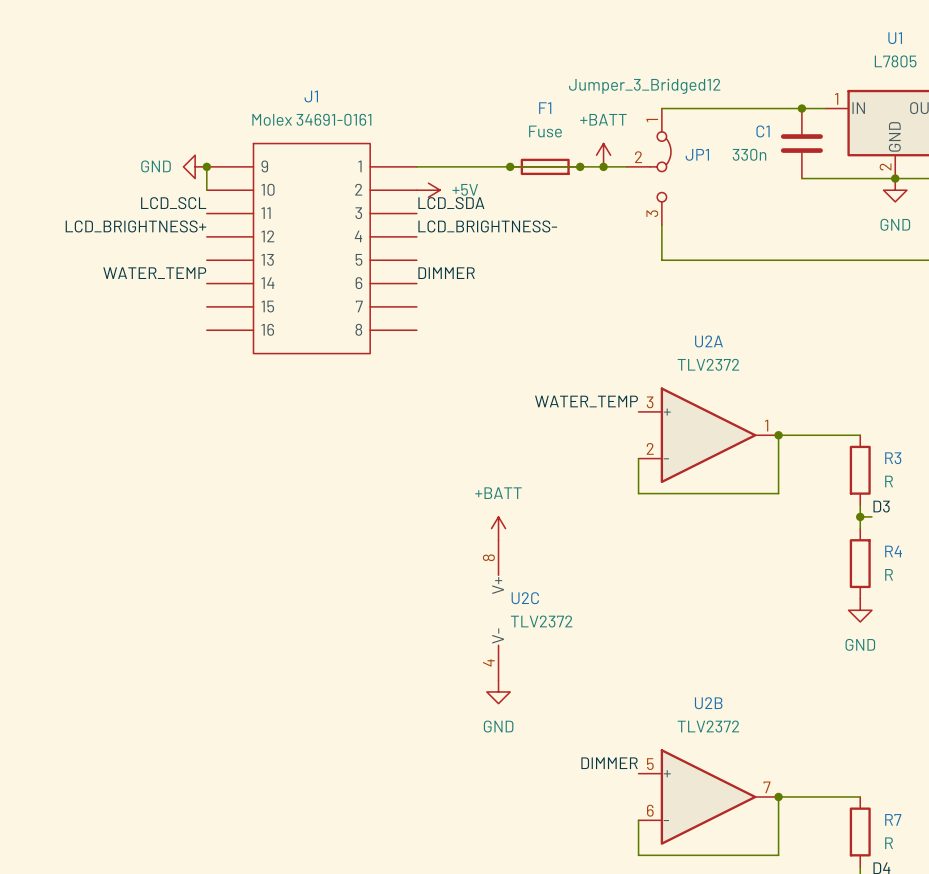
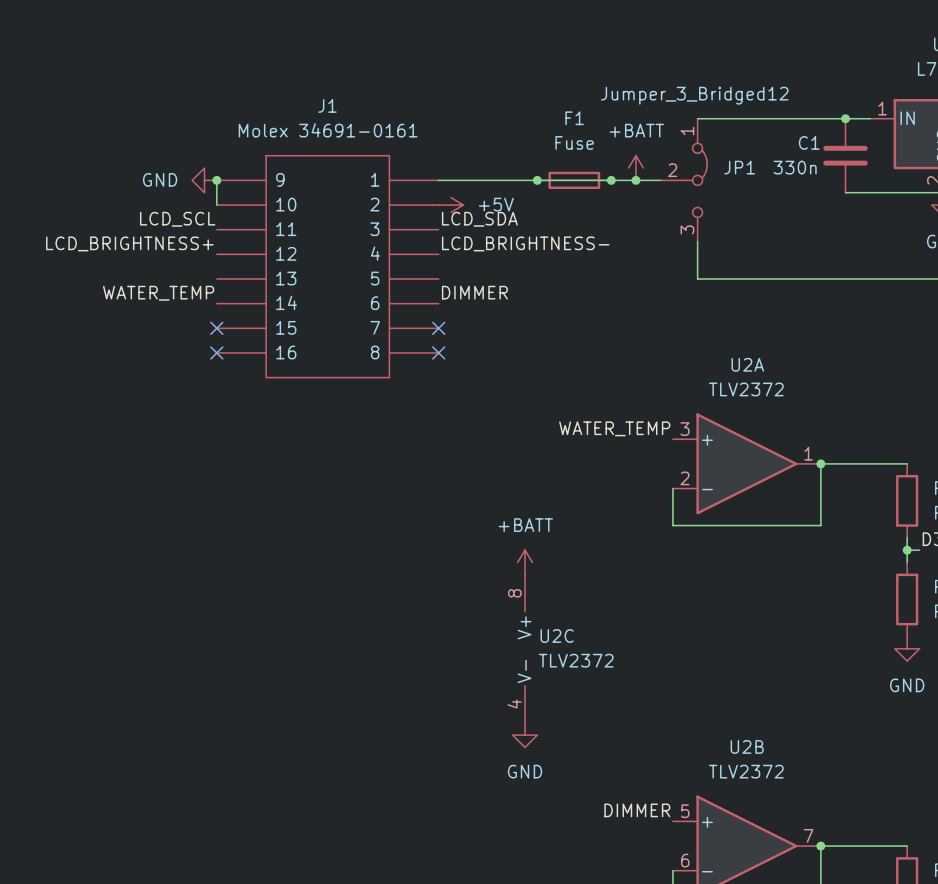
no-connect mark: none -> (216, 328)
no-connect mark: none -> (438, 328)
no-connect mark: none -> (216, 352)
no-connect mark: none -> (438, 352)

